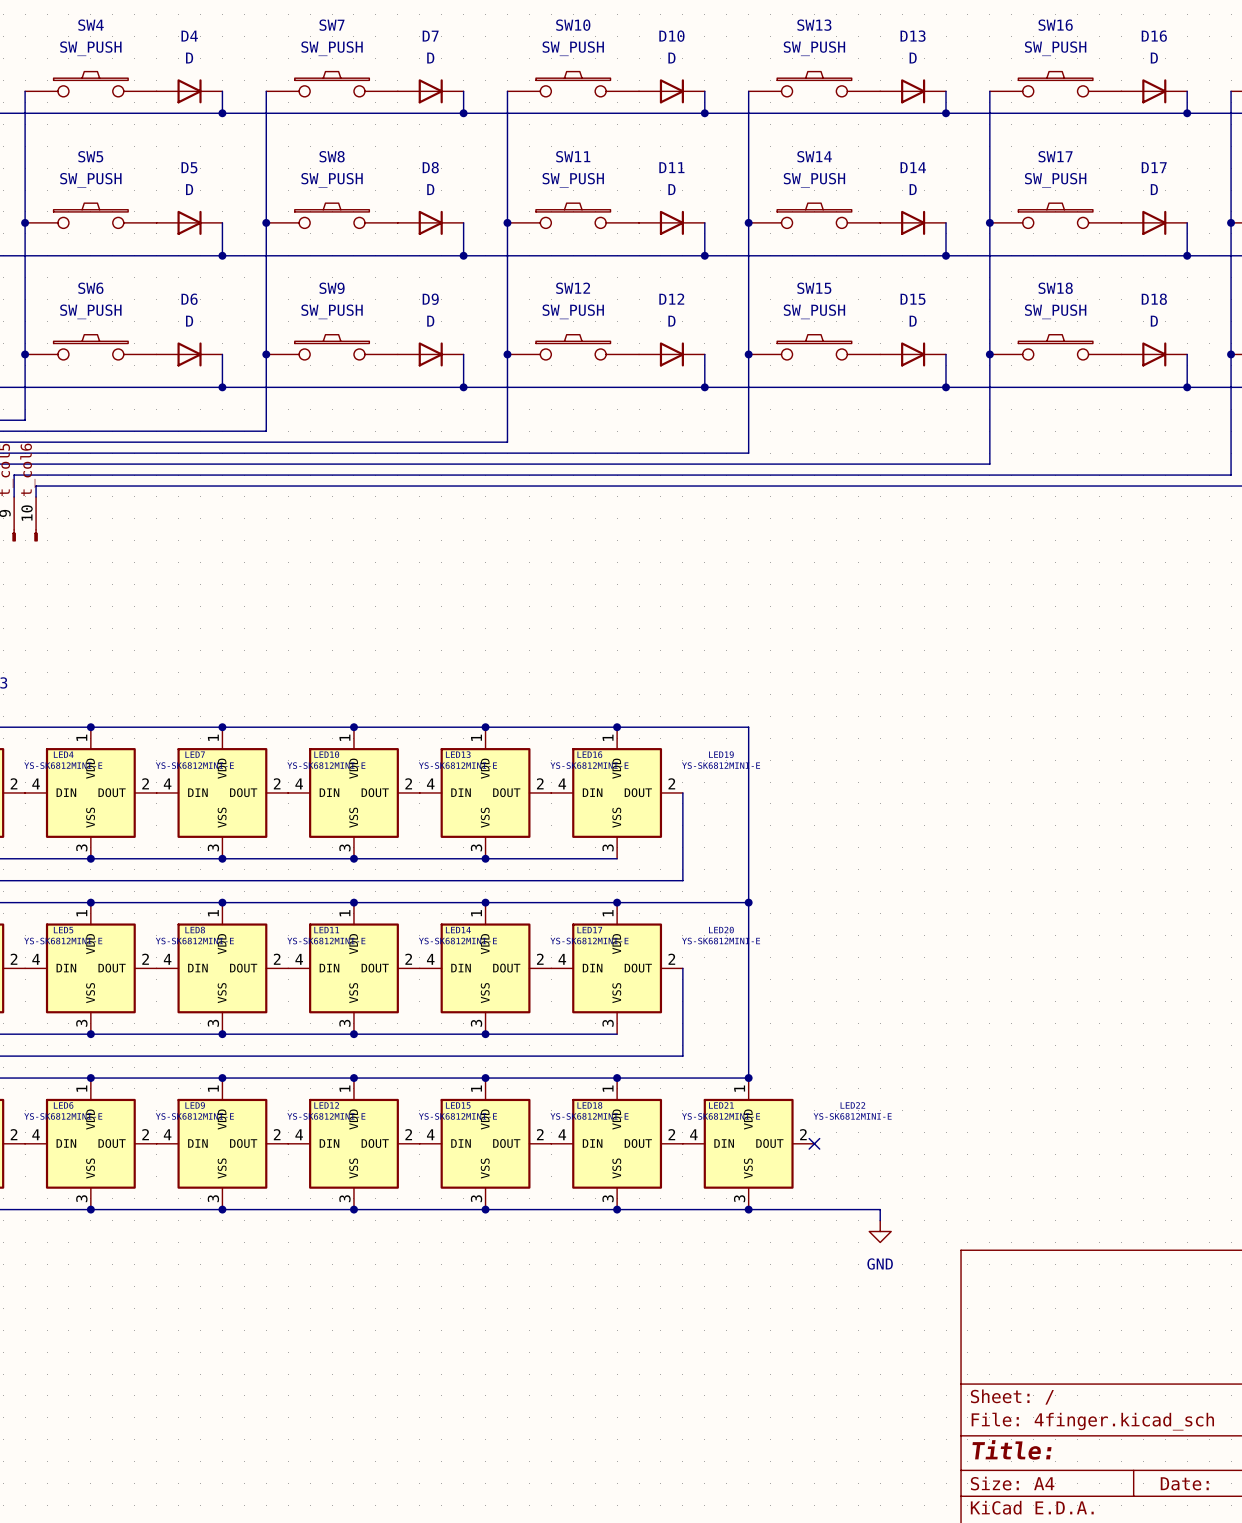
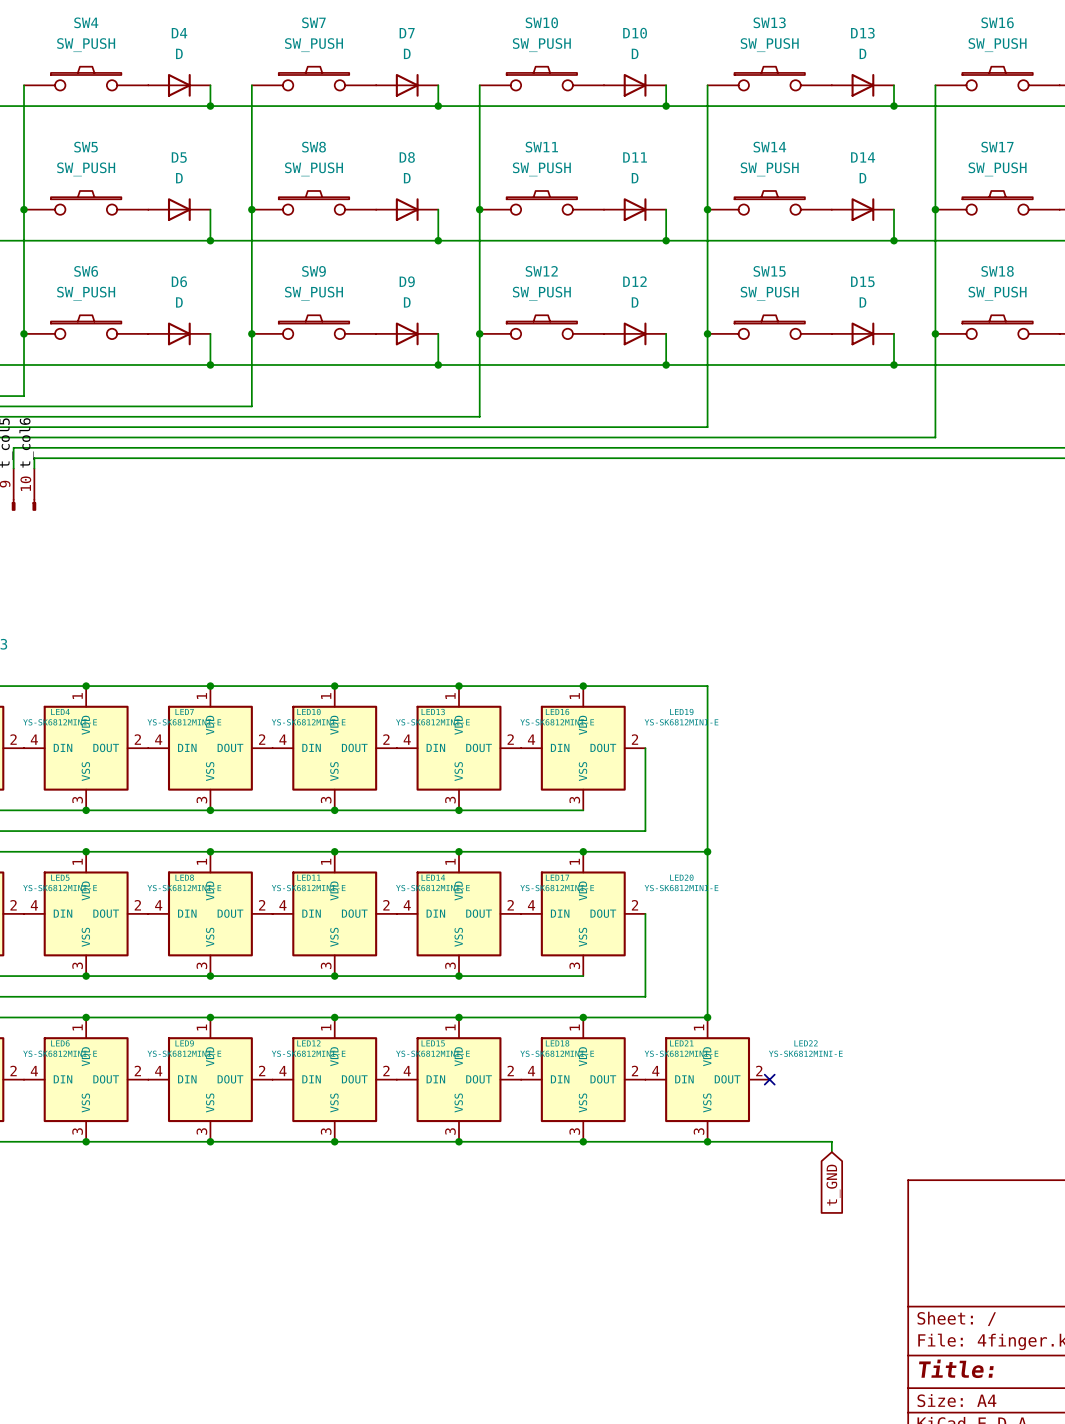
power symbol: GND (880, 1231) -> none
global label: none -> t_GND (833, 1185)

